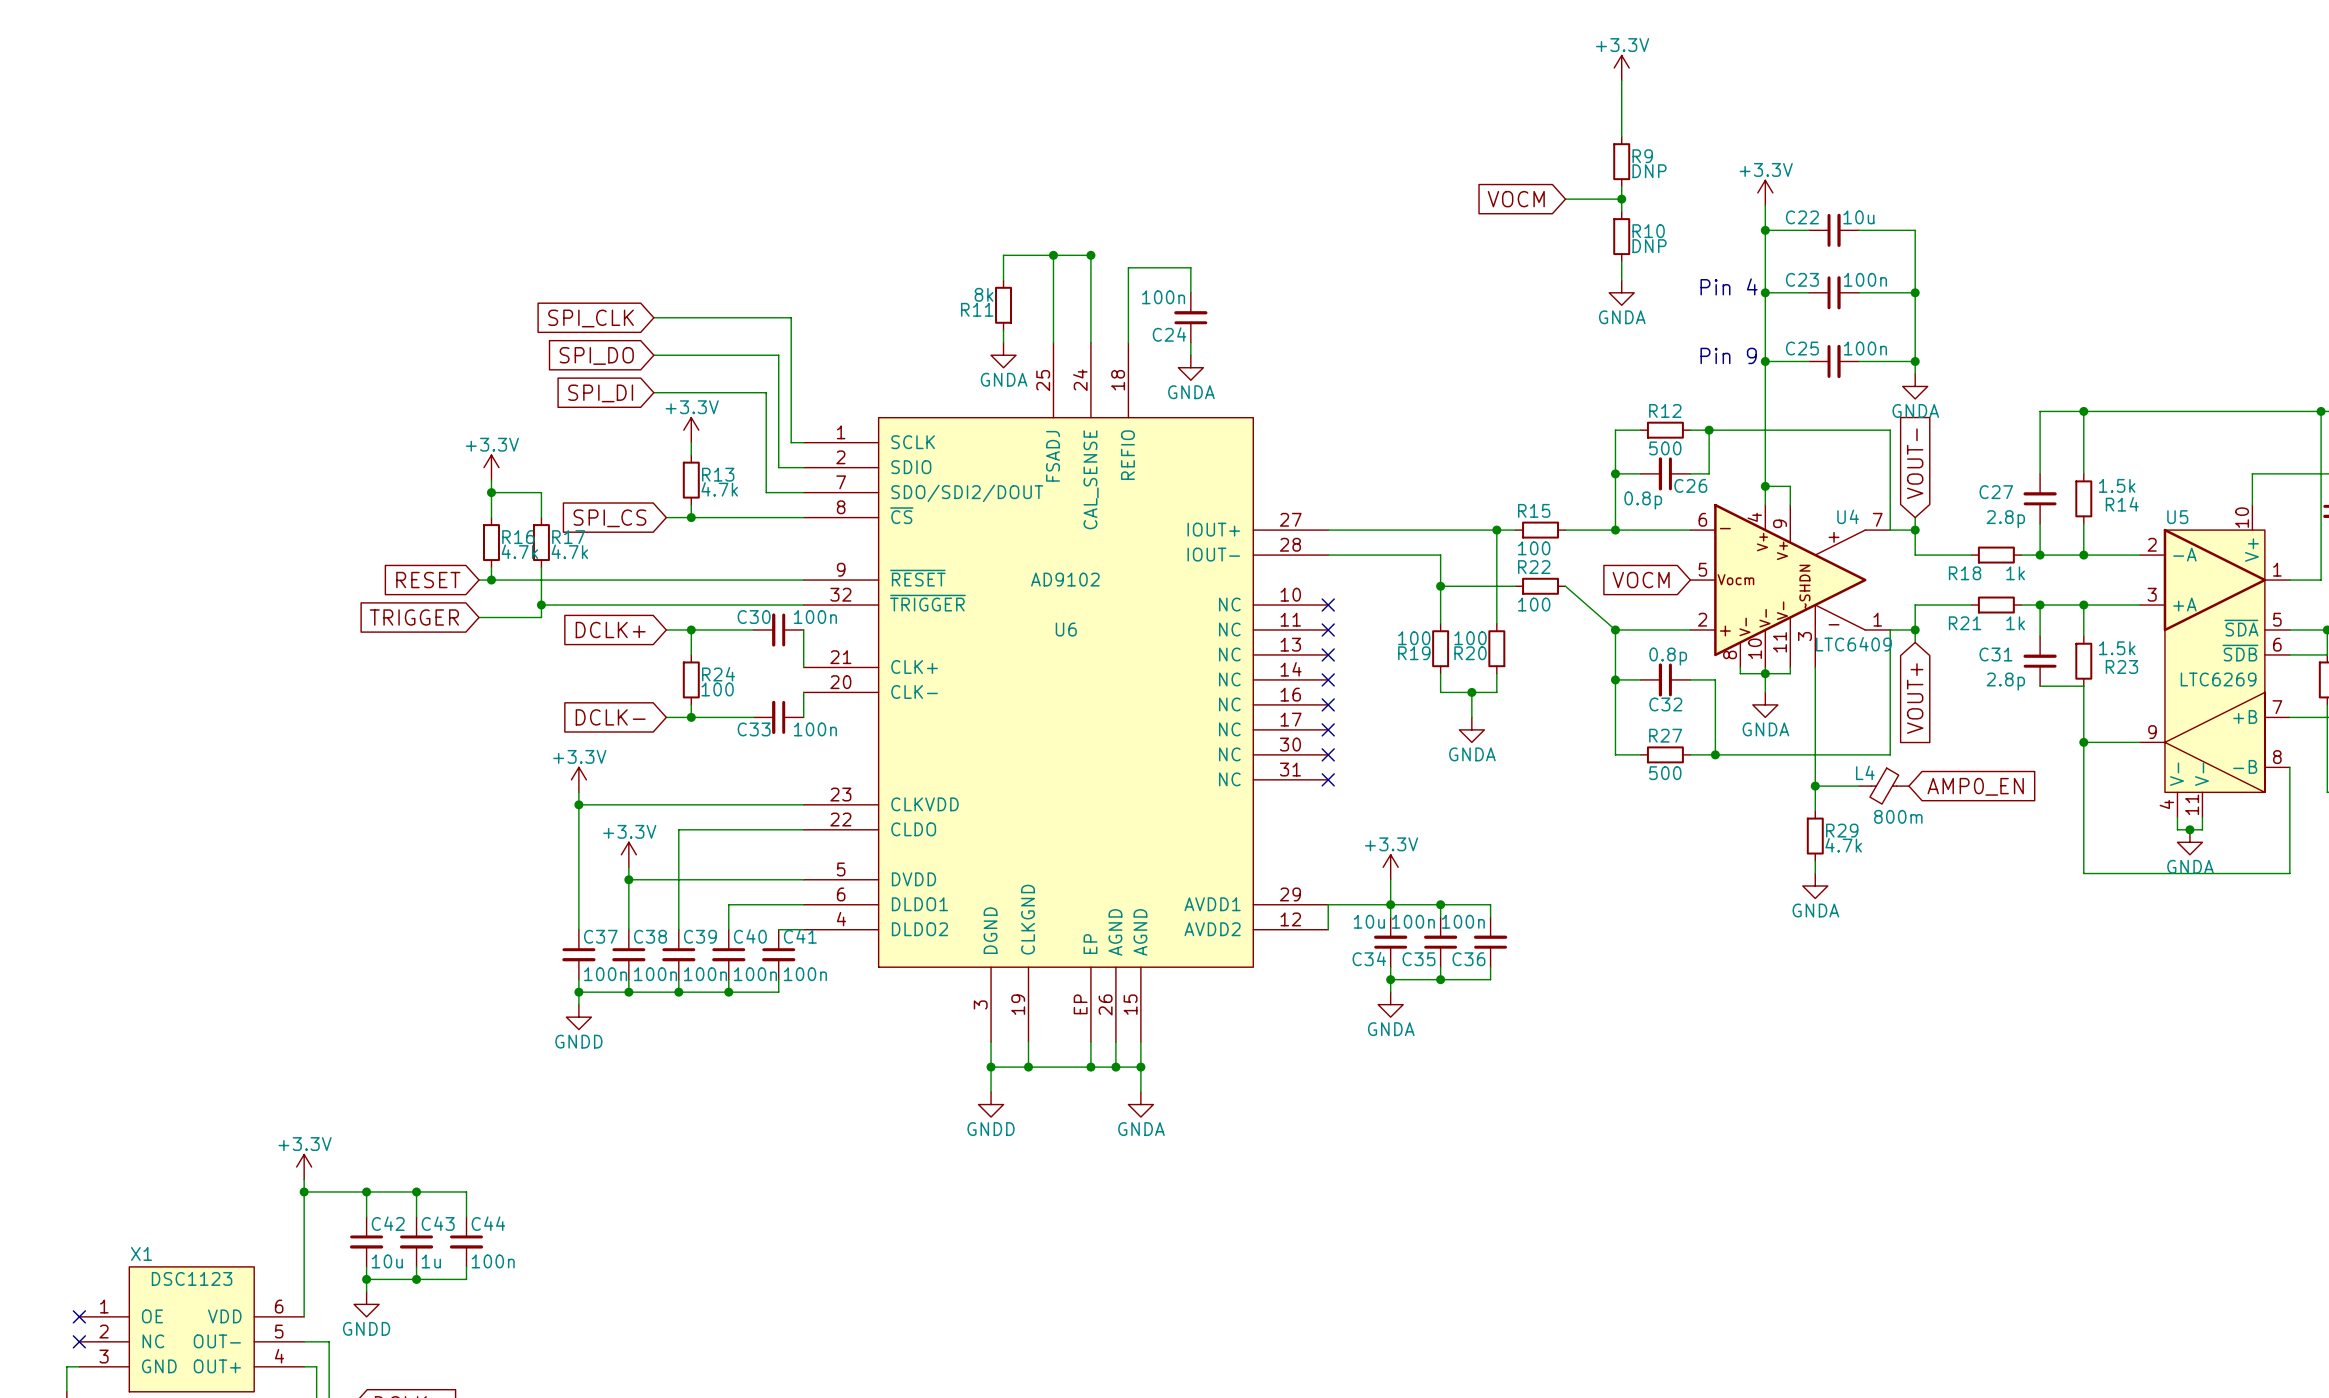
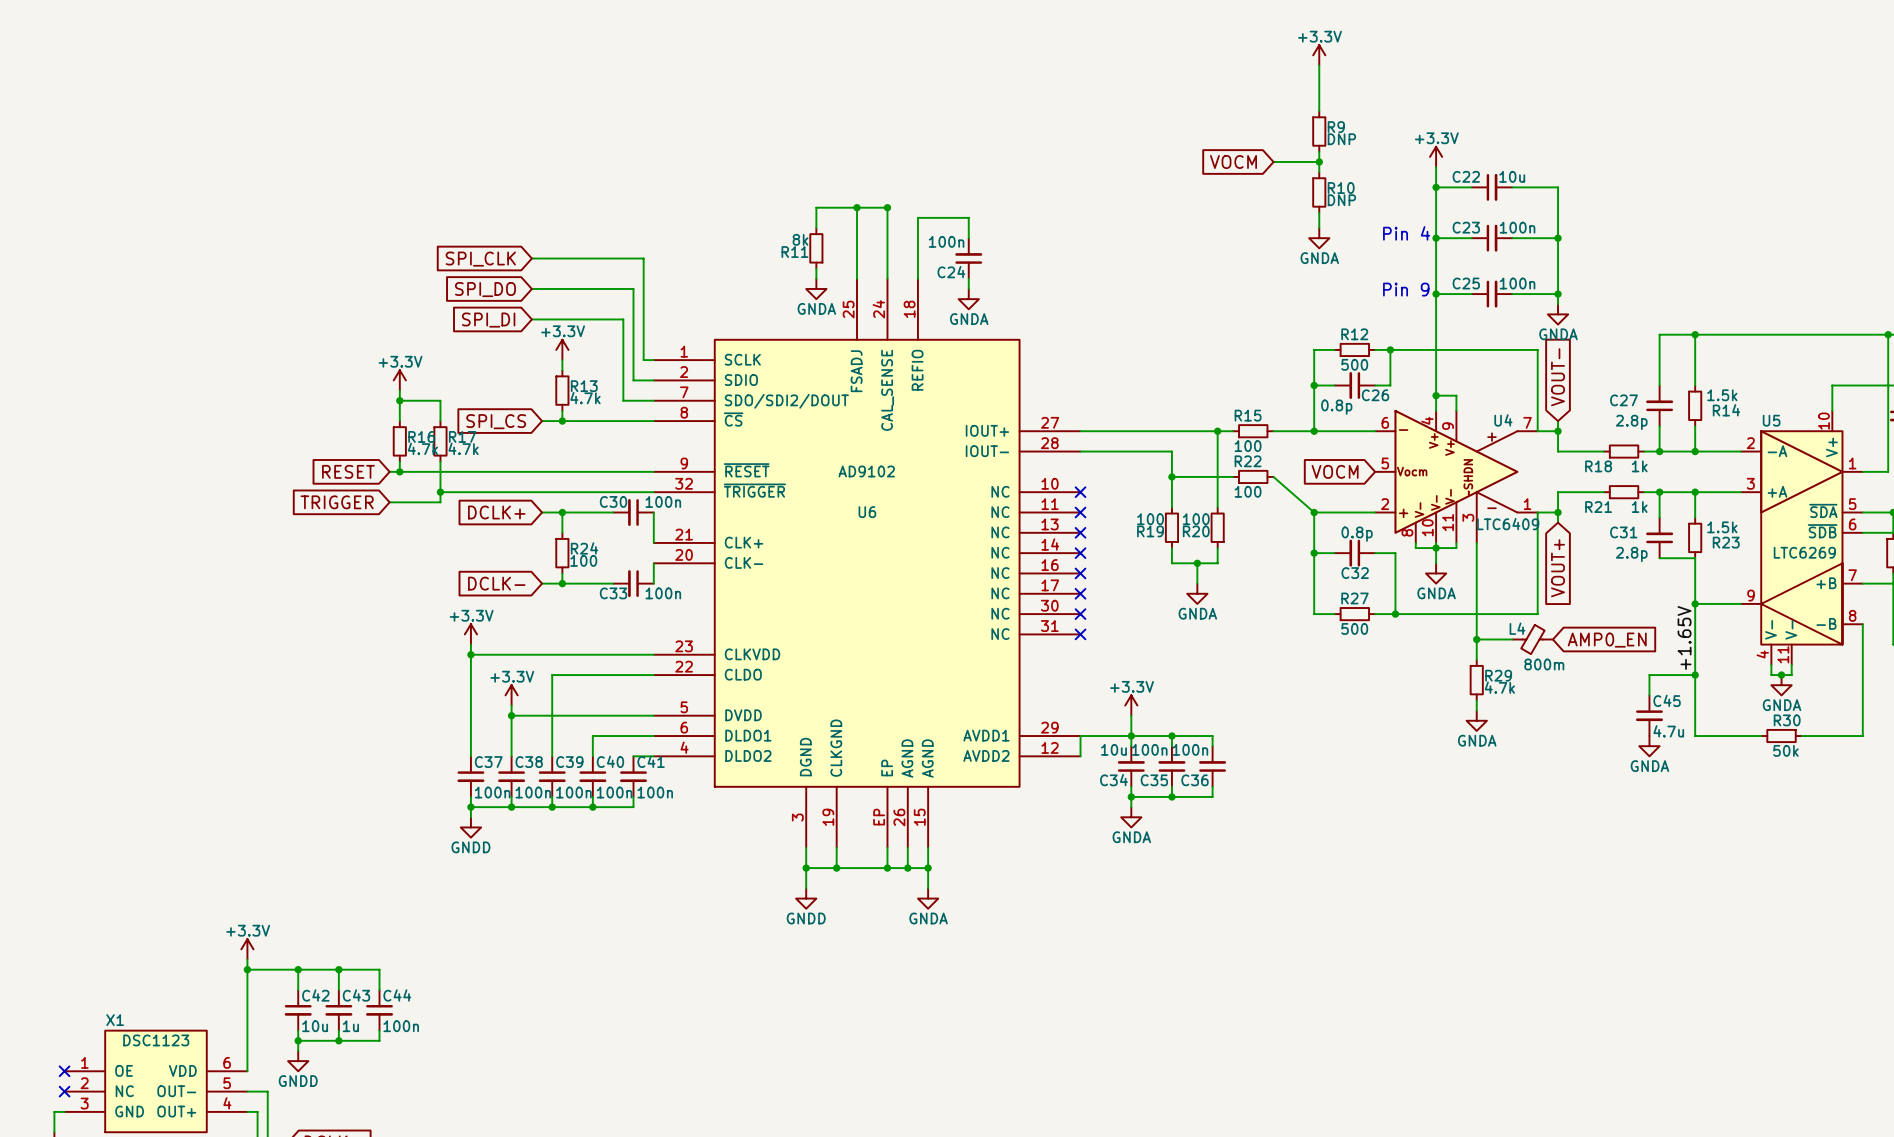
label: none -> +1.65V (1684, 637)
wire: none -> (1695, 675) (1649, 675) (1649, 695)
junction: none -> (1695, 675)
wire: (2083, 873) (2289, 873) -> (1695, 710) (1695, 736) (1761, 736)
wire: none -> (1862, 710) (1862, 736) (1801, 736)
C45: none -> 4.7u (1649, 715)
R30: none -> 50k (1781, 736)
power symbol: none -> GNDA (1649, 746)

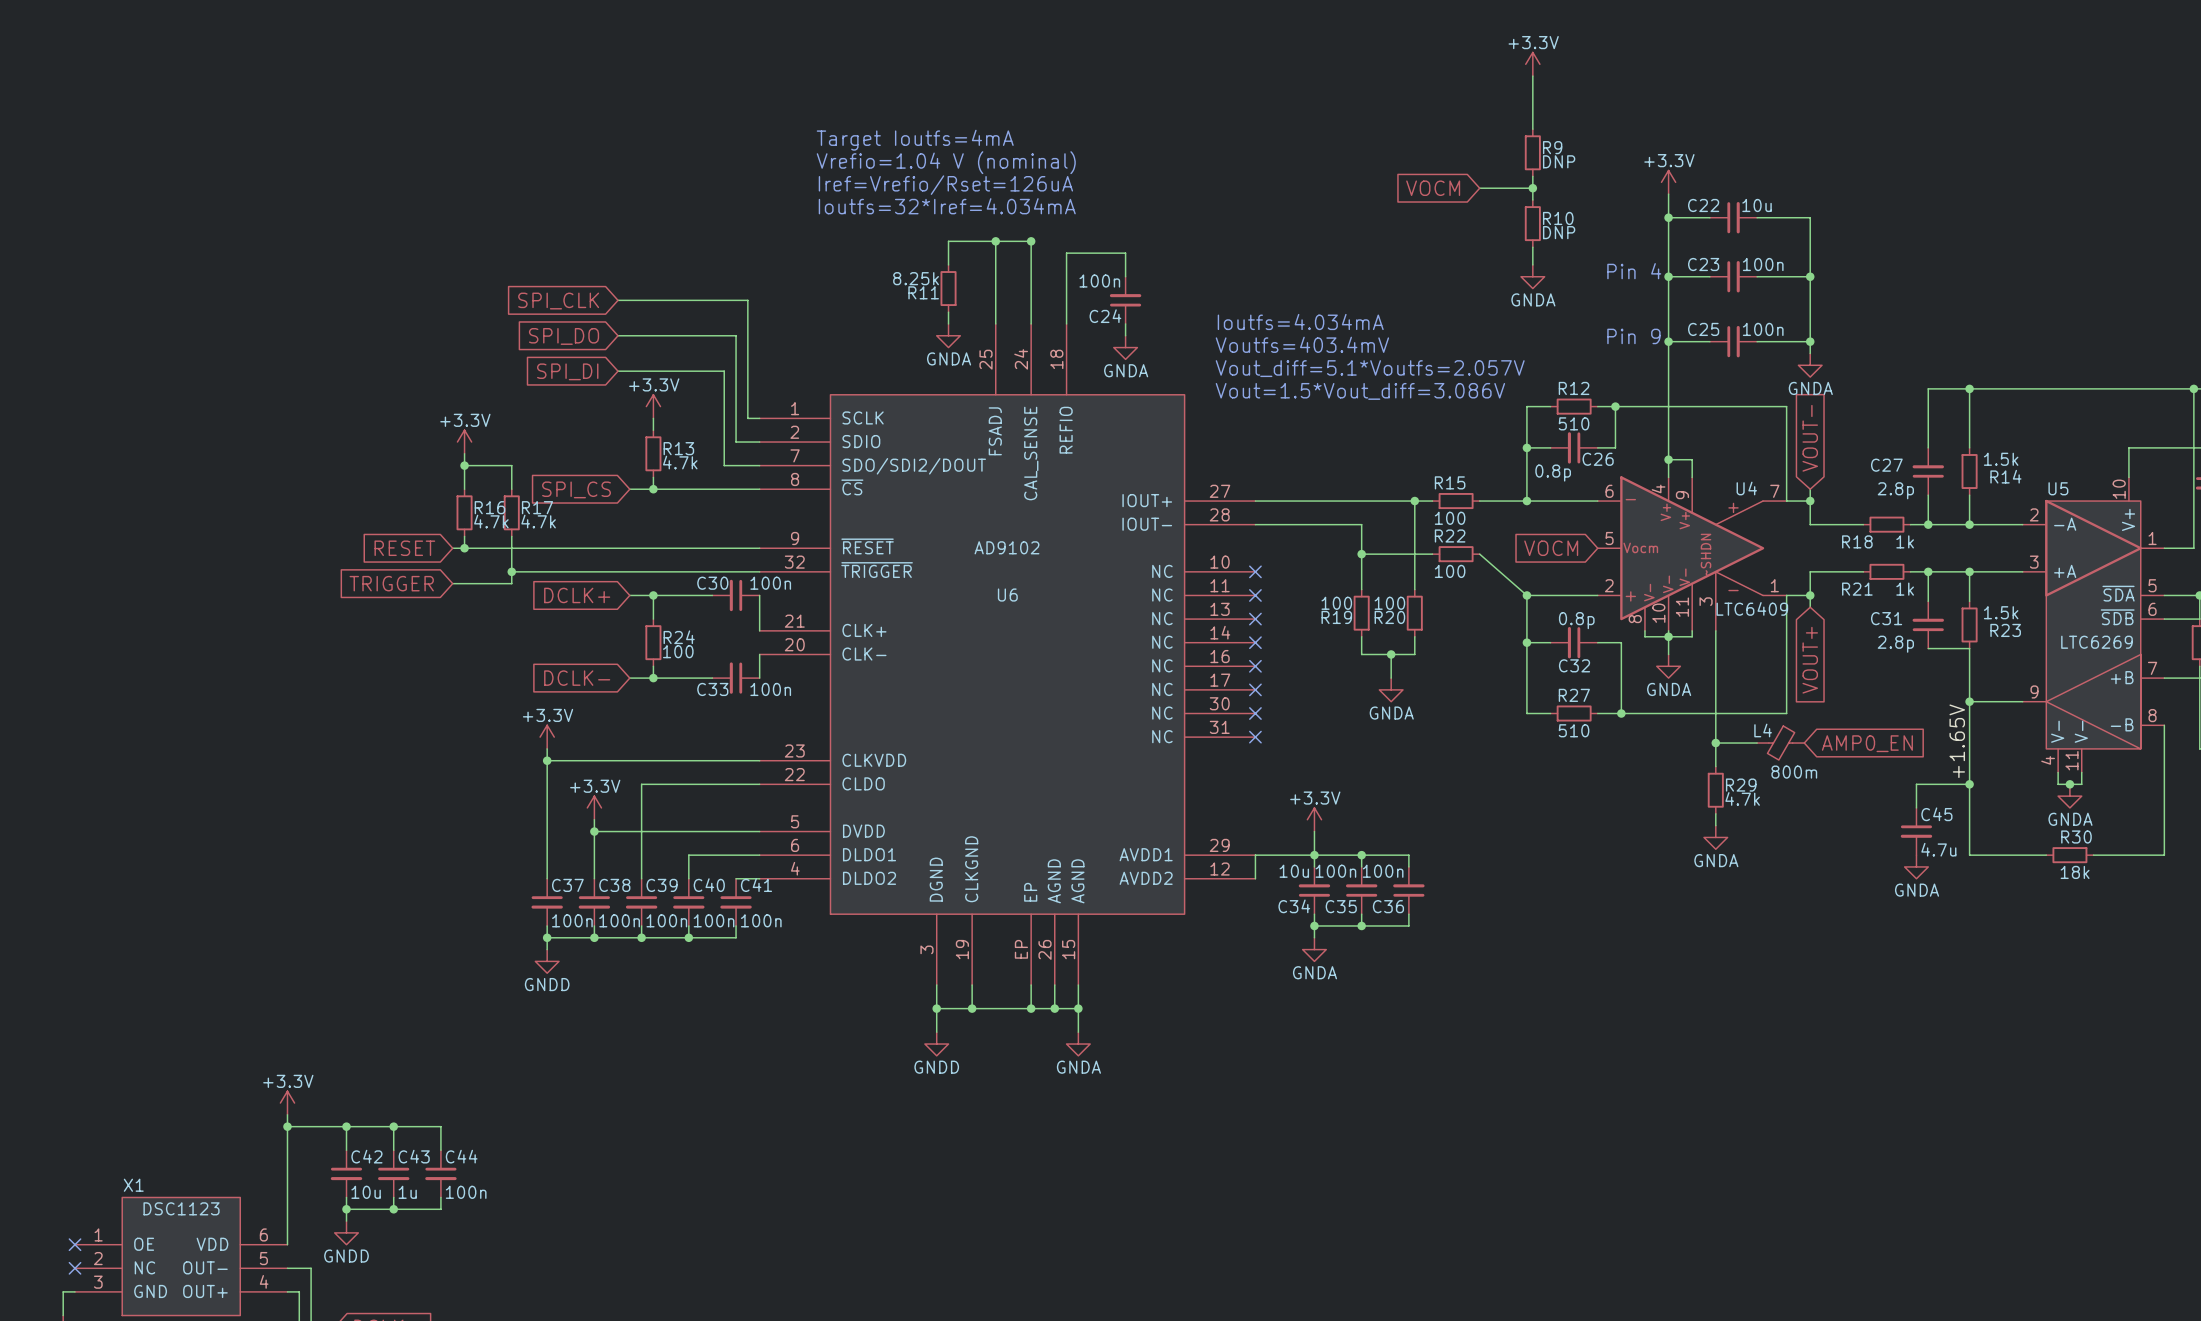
text: none -> Target Ioutfs=4mA (915, 140)
text: none -> Vrefio=1.04 V (nominal) (946, 162)
text: none -> Iref=Vrefio/Rset=126uA (945, 185)
text: none -> Ioutfs=32*Iref=4.034mA (947, 206)
R11 value: 8k (800, 239) -> 8.25k (916, 278)
text: none -> Ioutfs=4.034mA (1300, 321)
text: none -> Voutfs=403.4mV (1302, 344)
text: none -> Vout_diff=5.1*Voutfs=2.057V (1370, 368)
text: none -> Vout=1.5*Vout_diff=3.086V (1360, 391)
R12 value: 500 (1354, 364) -> 510 (1574, 423)
R27 value: 500 (1354, 628) -> 510 (1574, 730)
R30 value: 50k (1785, 750) -> 18k (2075, 872)

